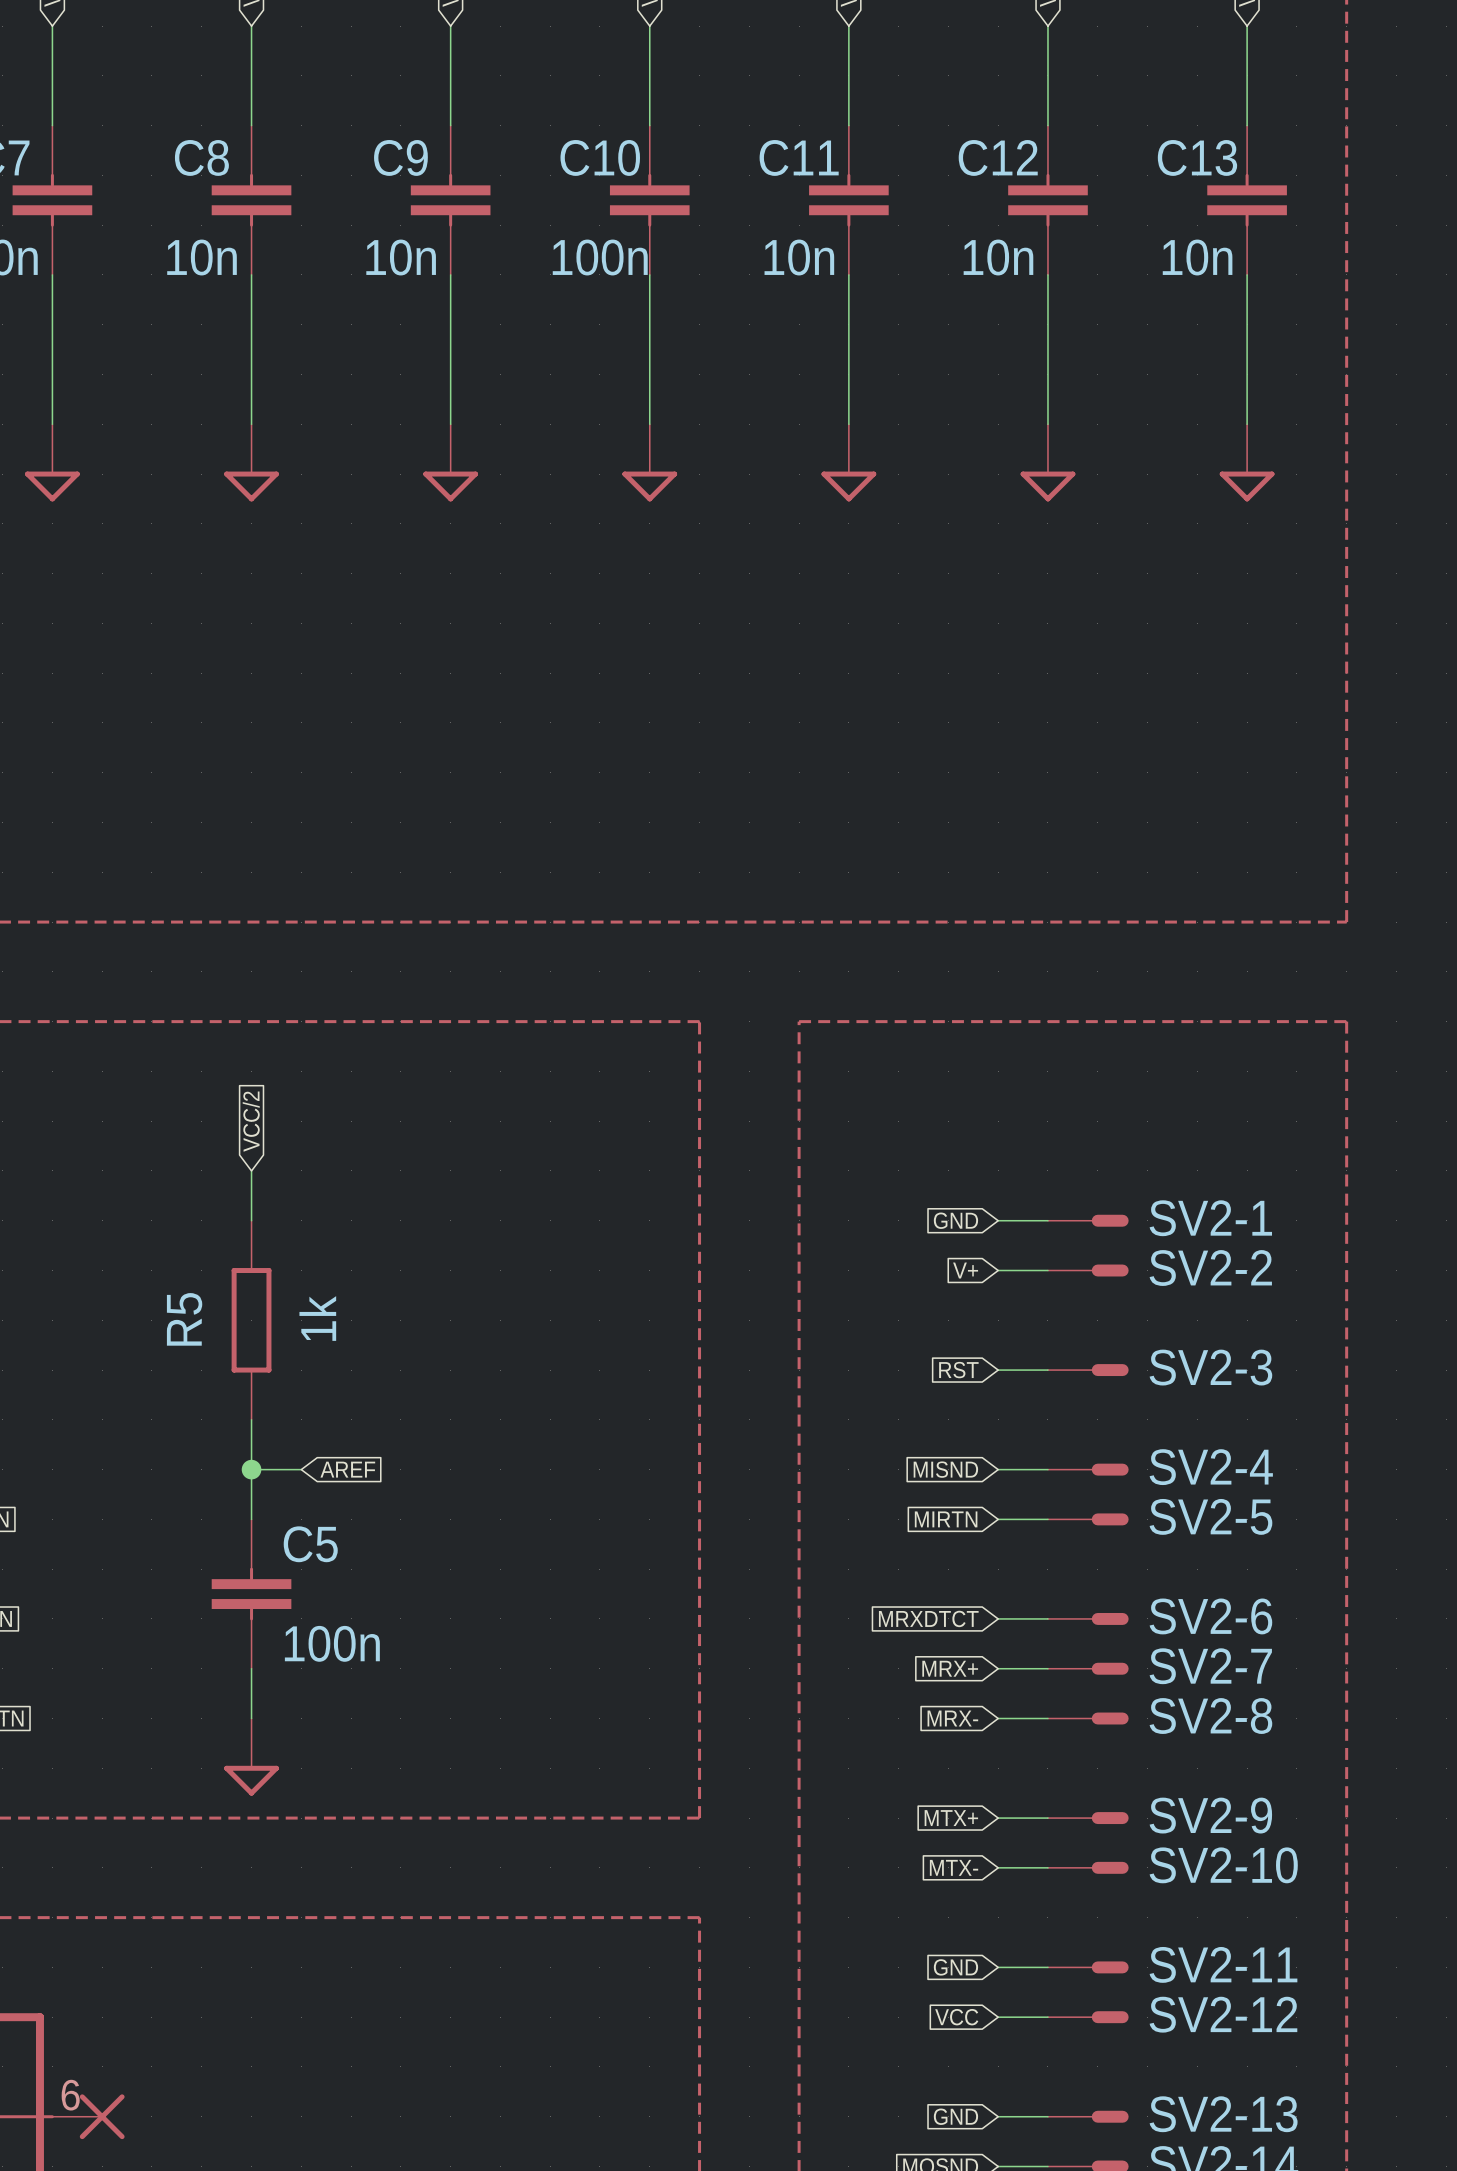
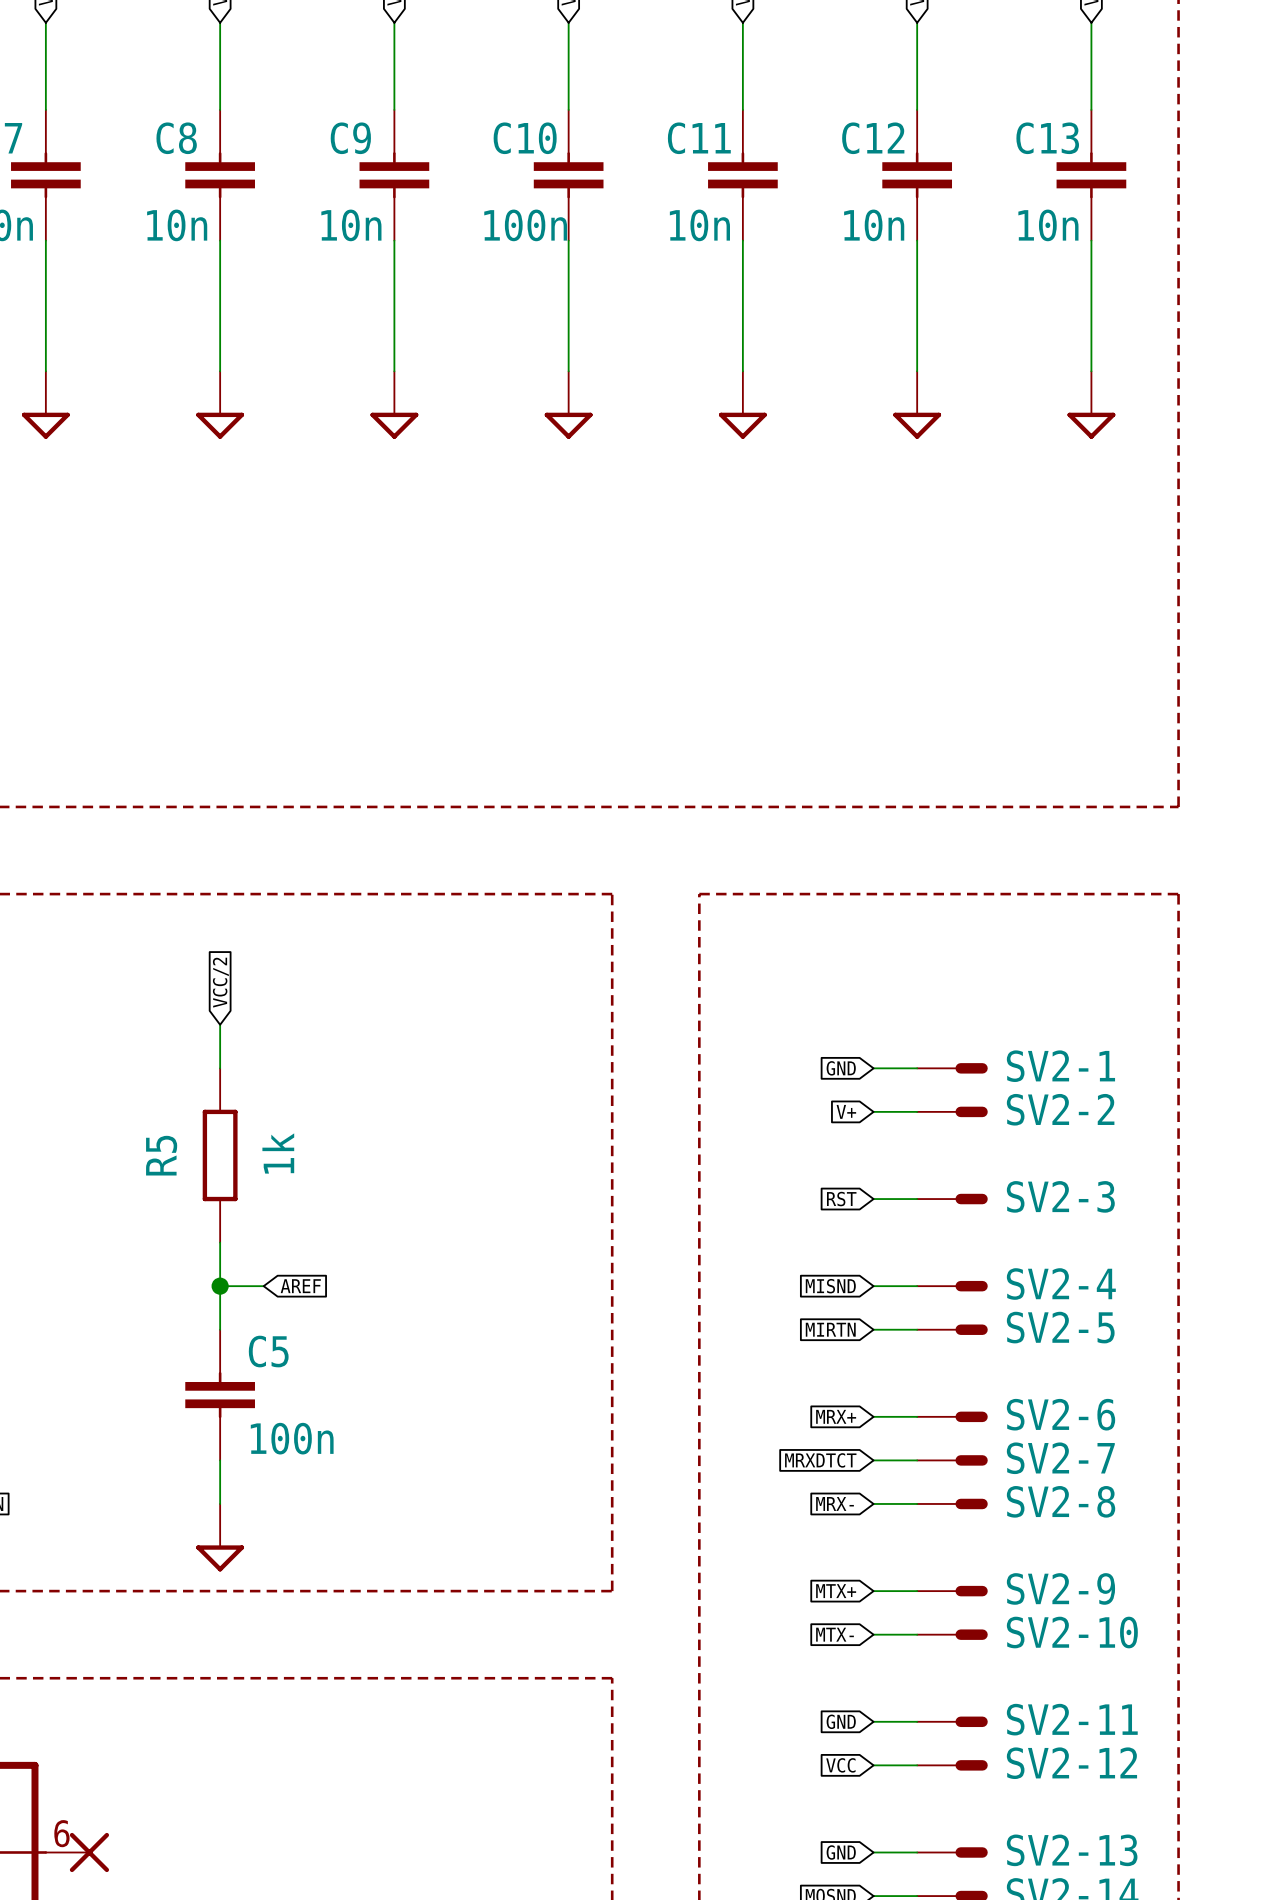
global label: MRXDTCT (928, 1618) -> MRX+ (836, 1416)
global label: MRX+ (950, 1668) -> MRXDTCT (820, 1460)

